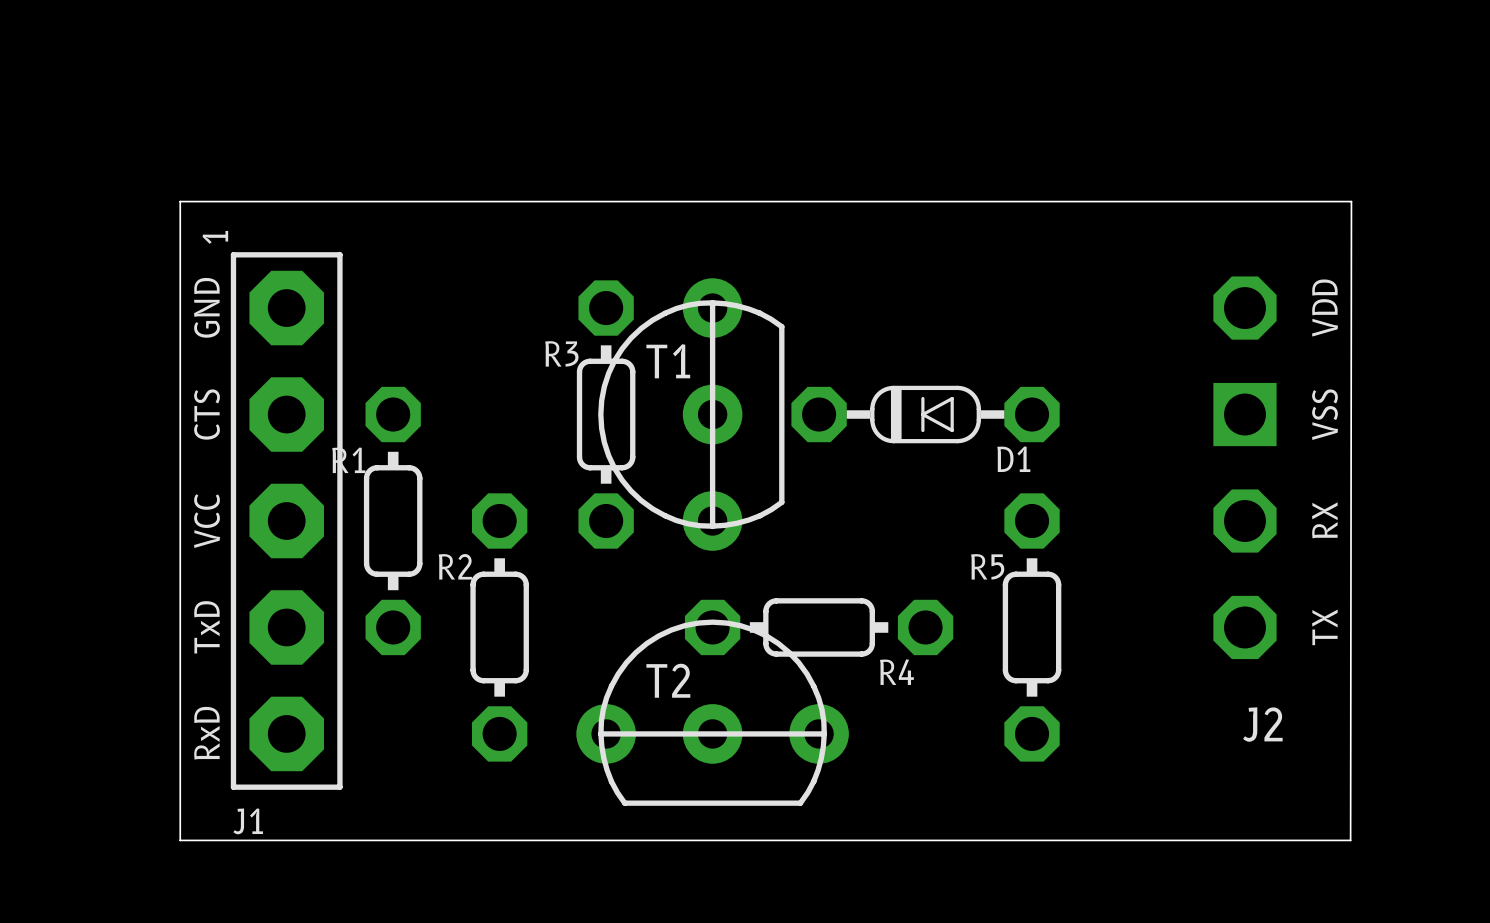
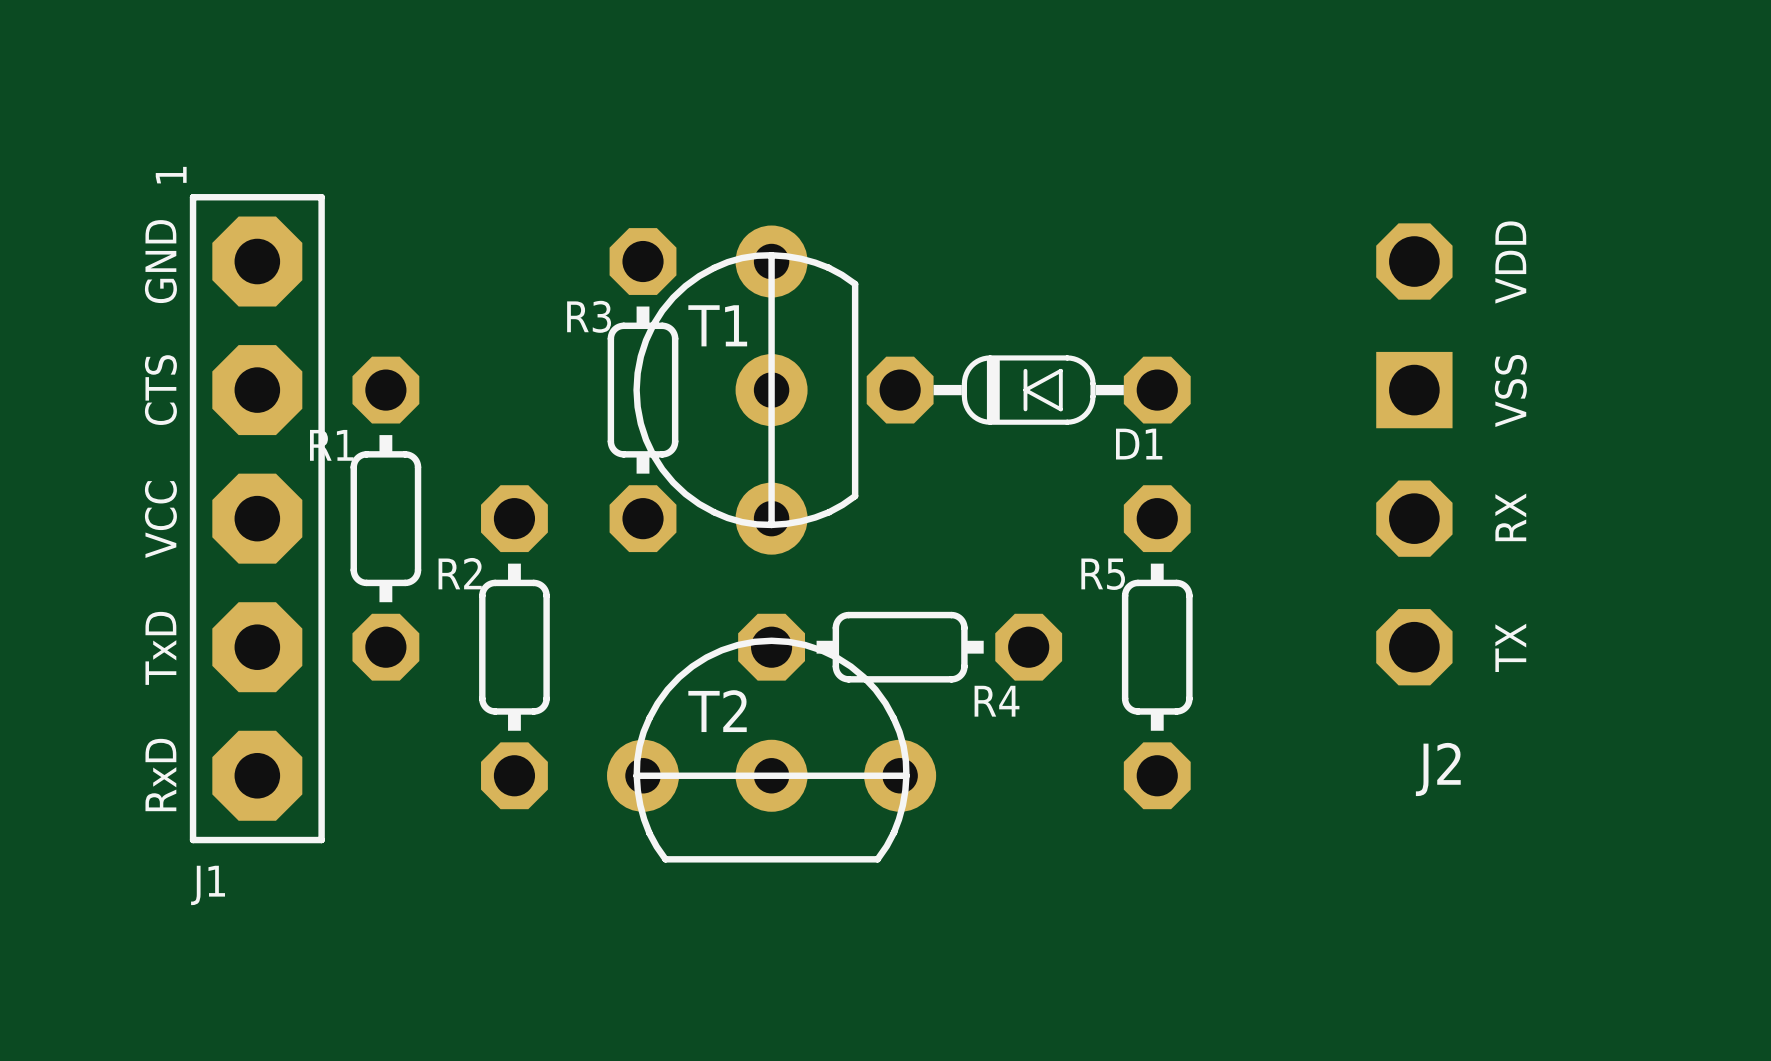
board edge: (180, 201) (1351, 201) (1350, 840) (180, 840) (180, 201) -> none

